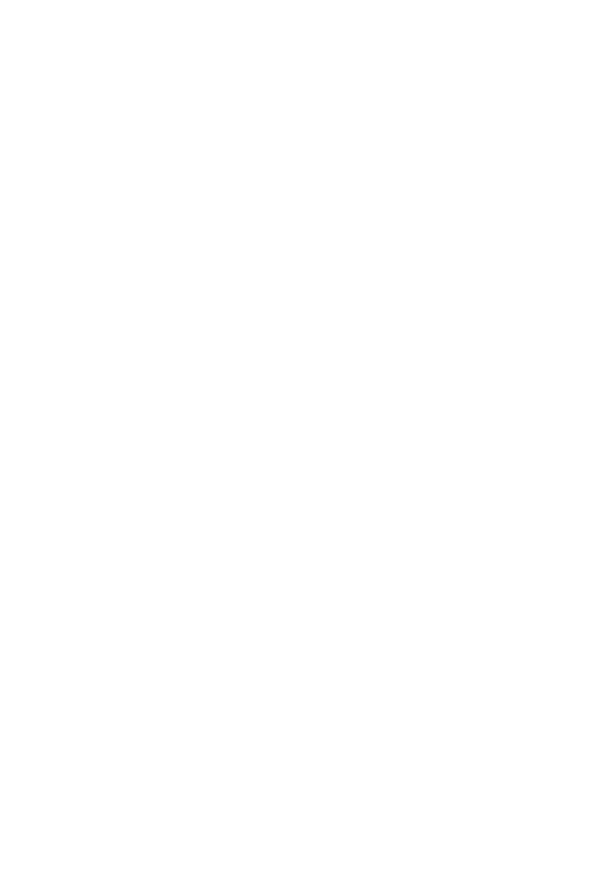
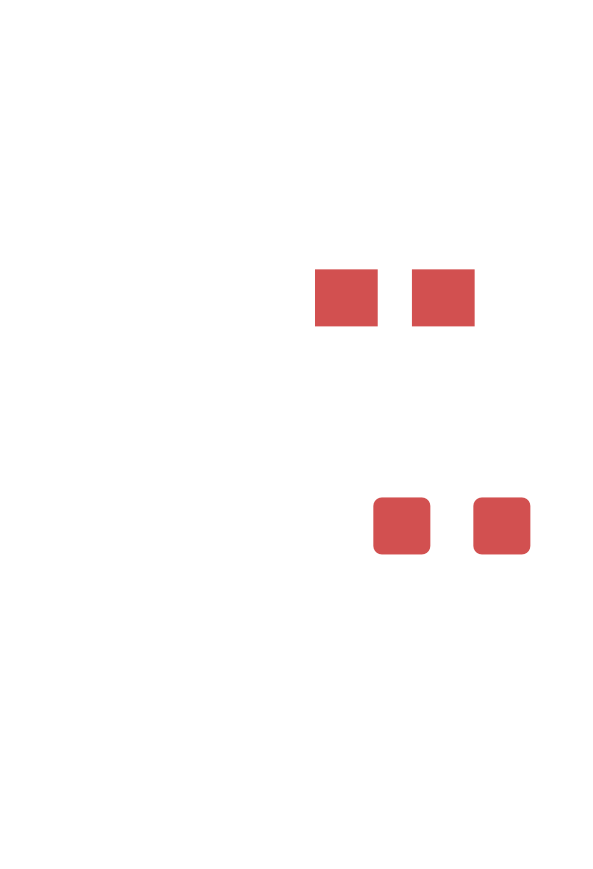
part: none -> (394, 297)
part: none -> (451, 525)

